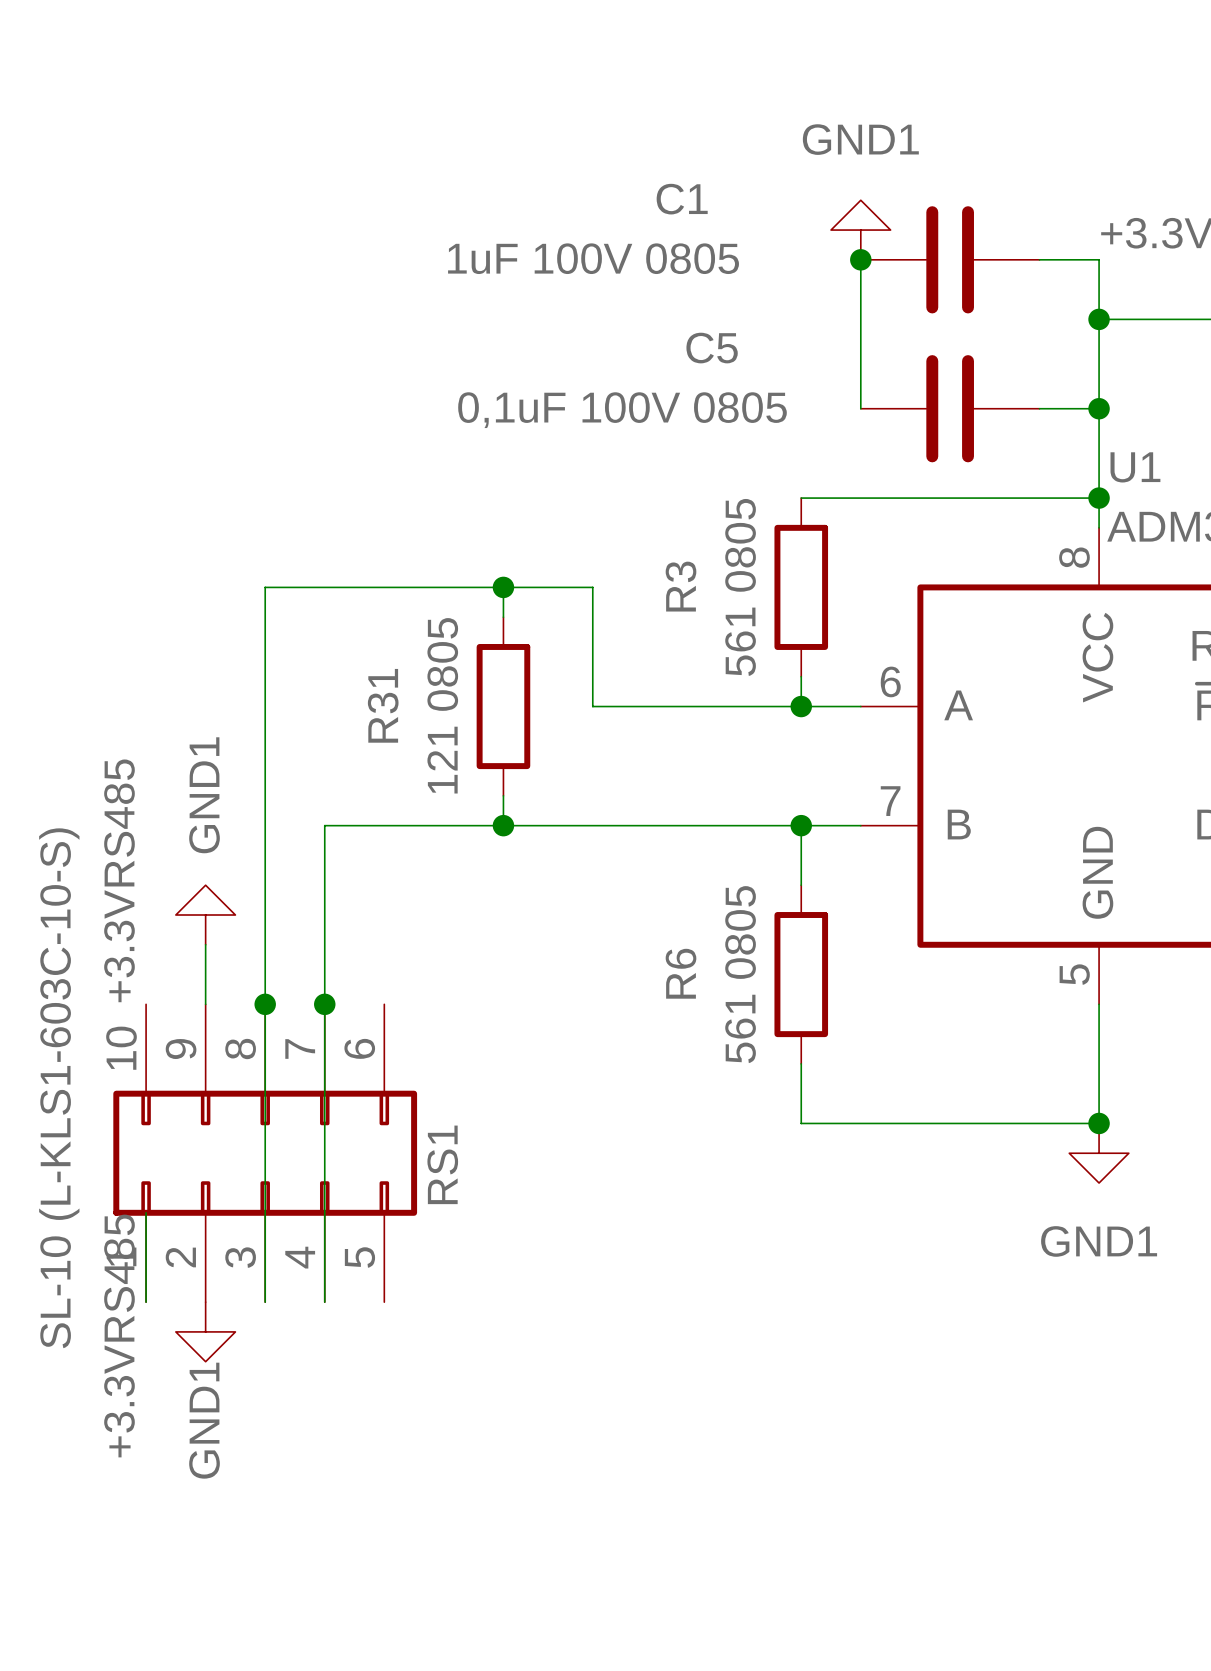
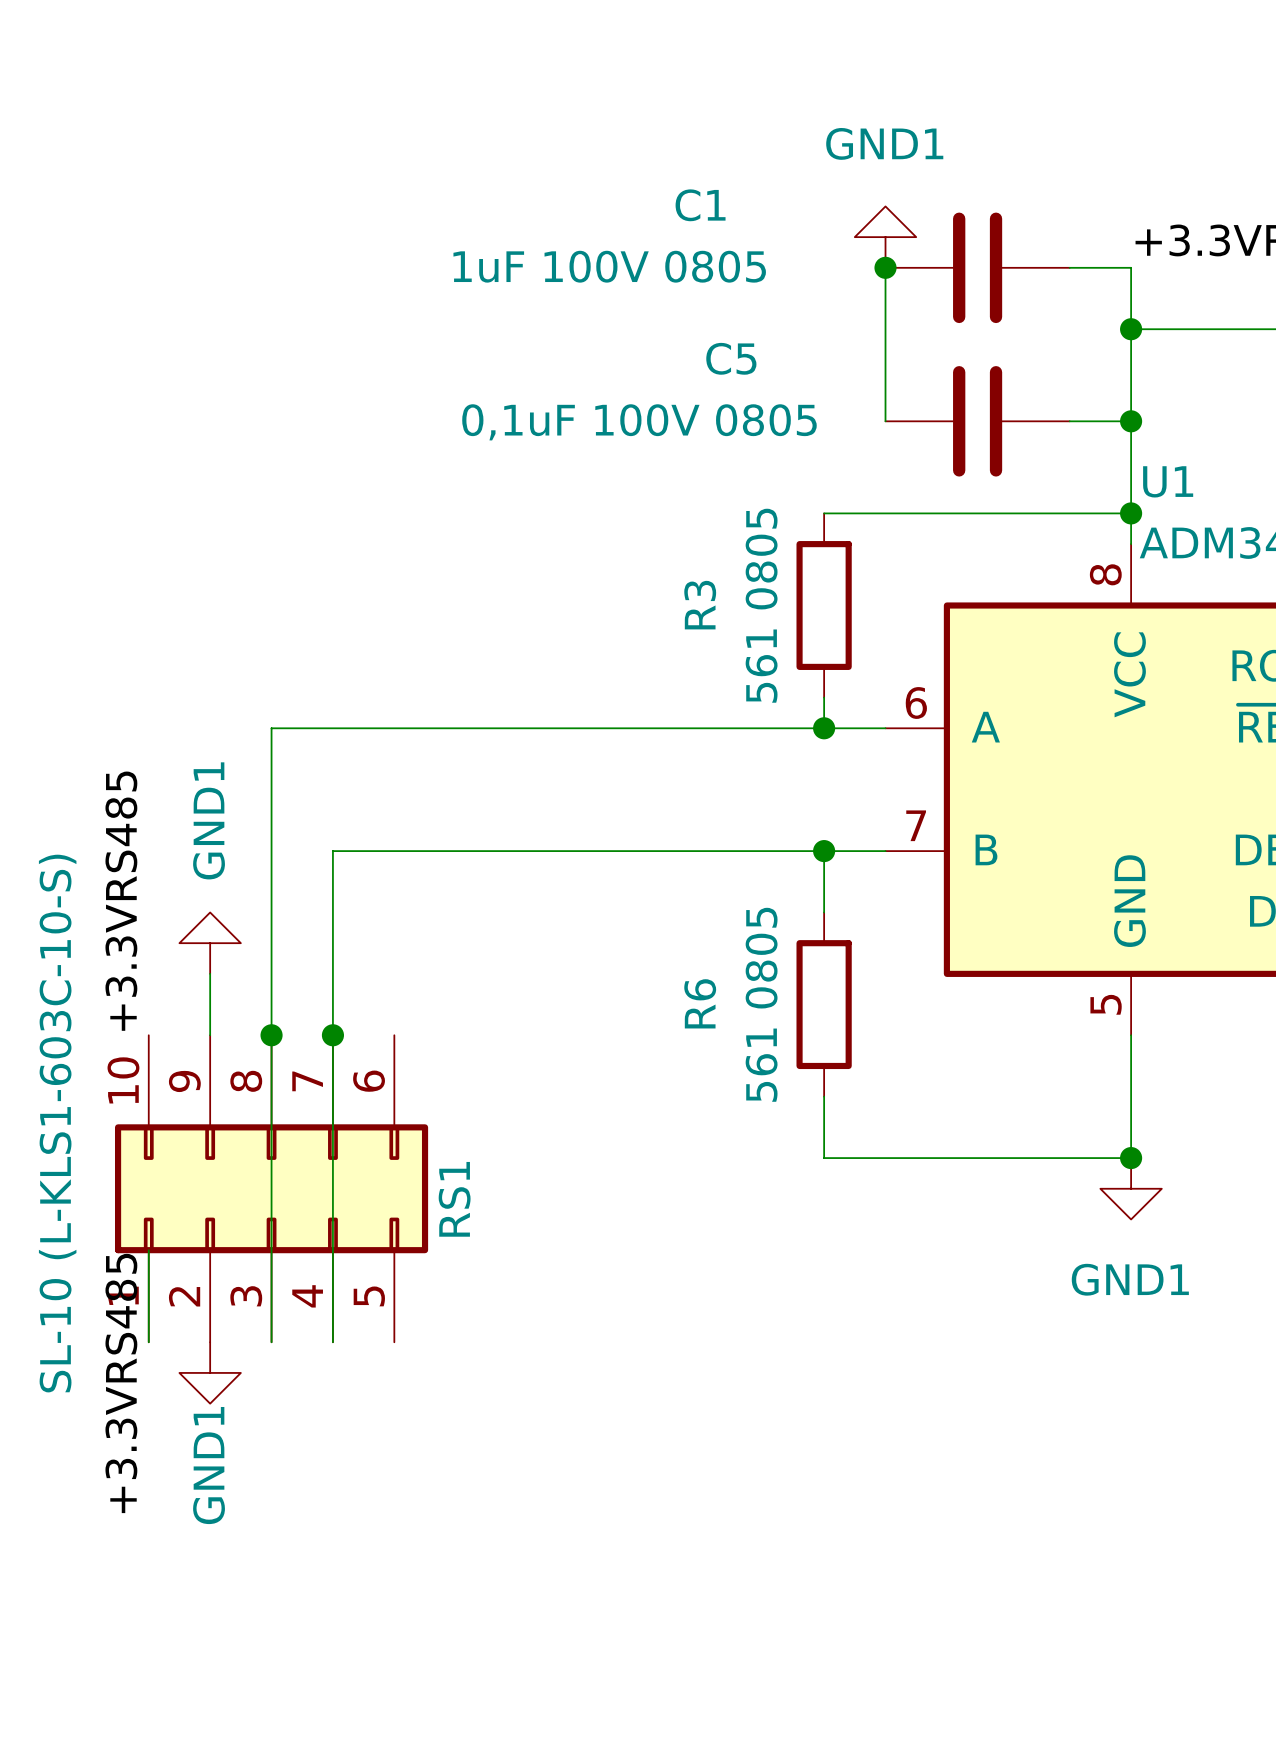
wire: (503, 587) (503, 617) -> none
junction: (503, 587) -> none
wire: (265, 706) (265, 587) (592, 587) (592, 706) -> (271, 728) (609, 728)
R31: 121 0805 (503, 706) -> none
wire: (503, 795) (503, 825) -> none
junction: (503, 825) -> none

